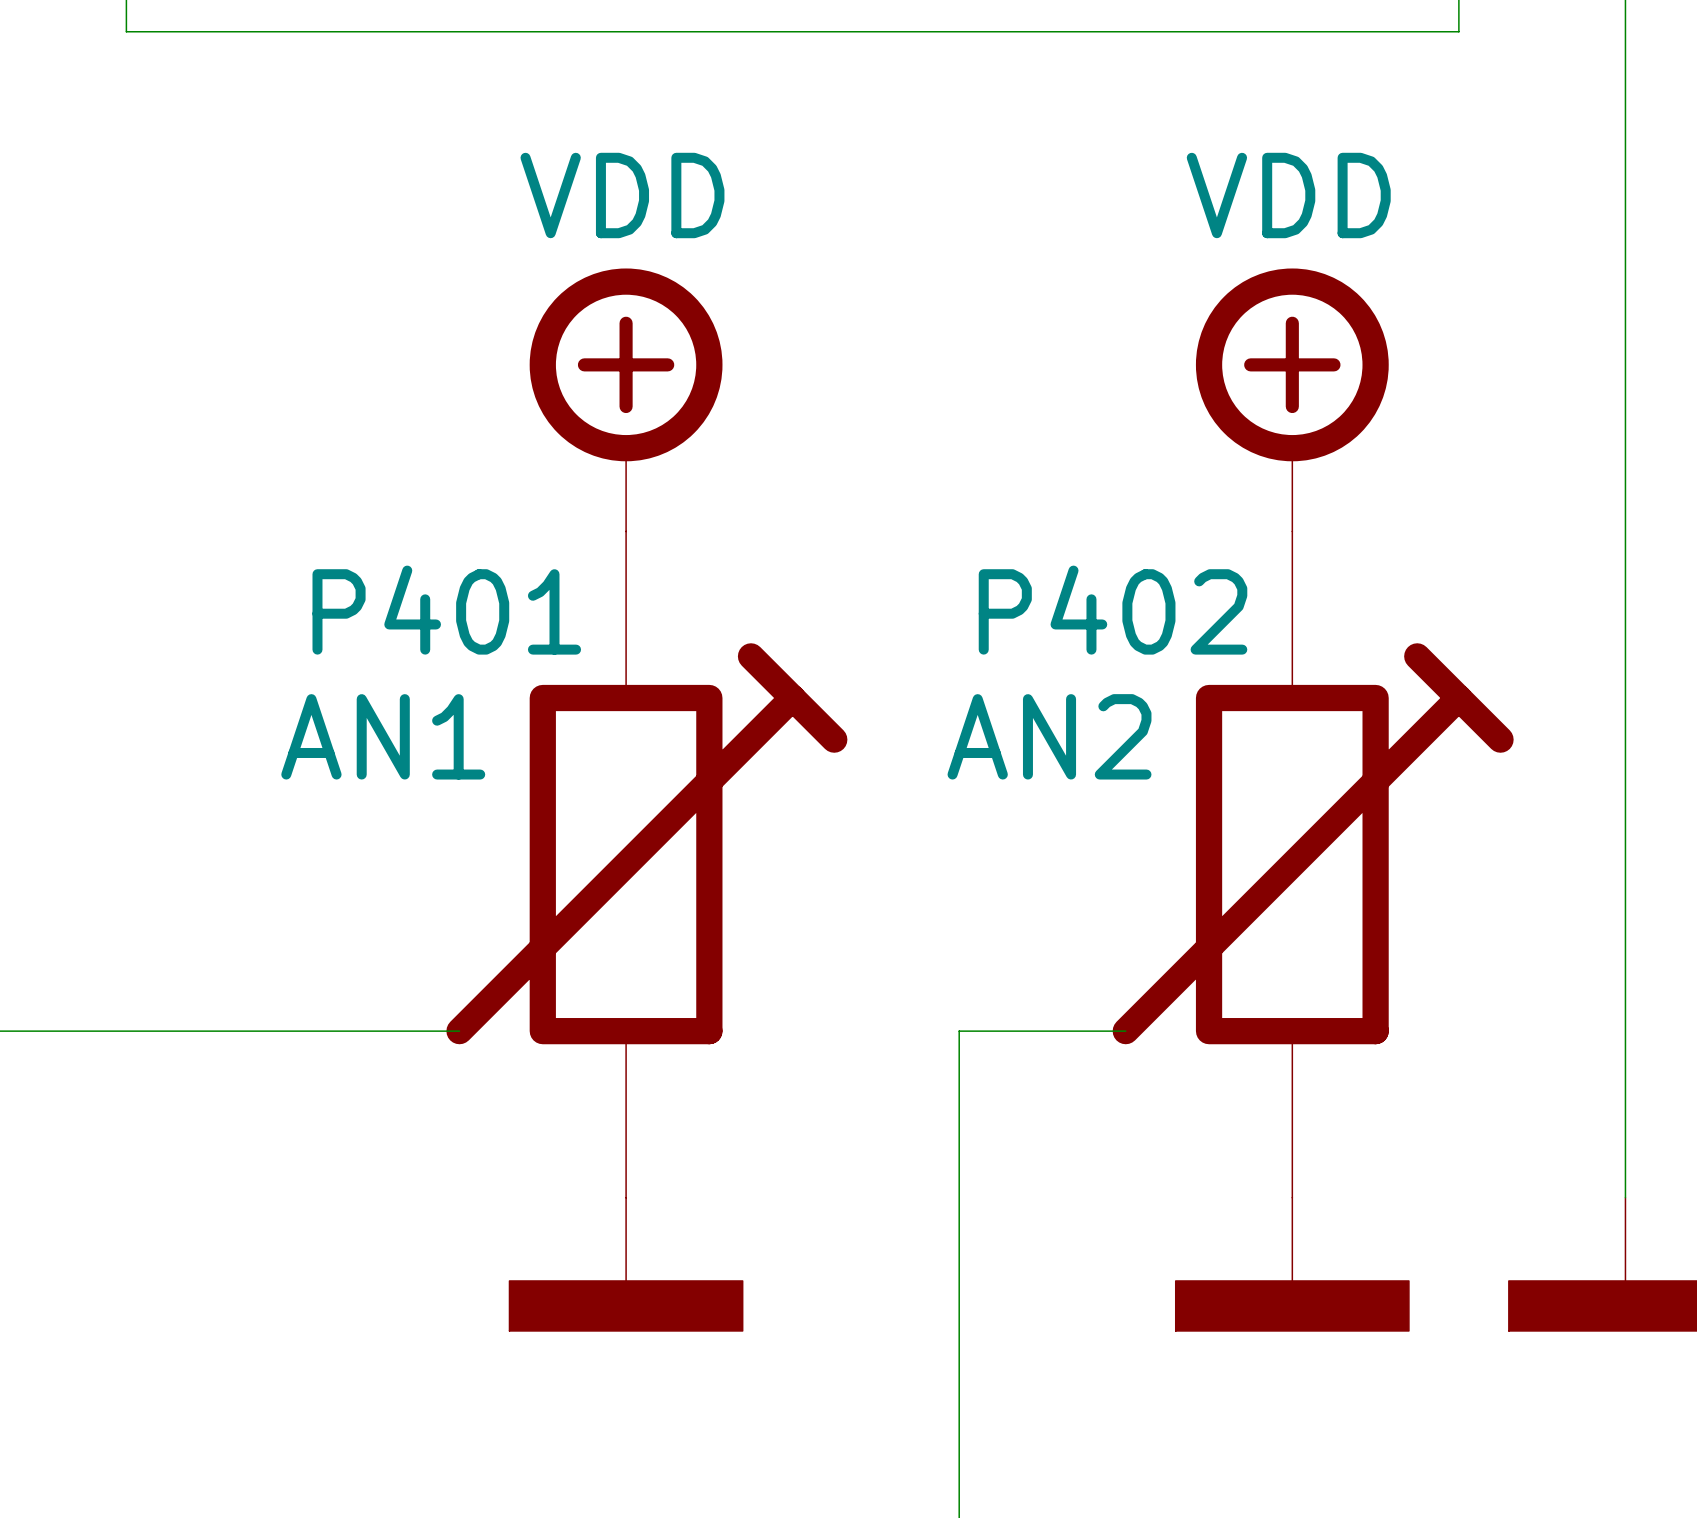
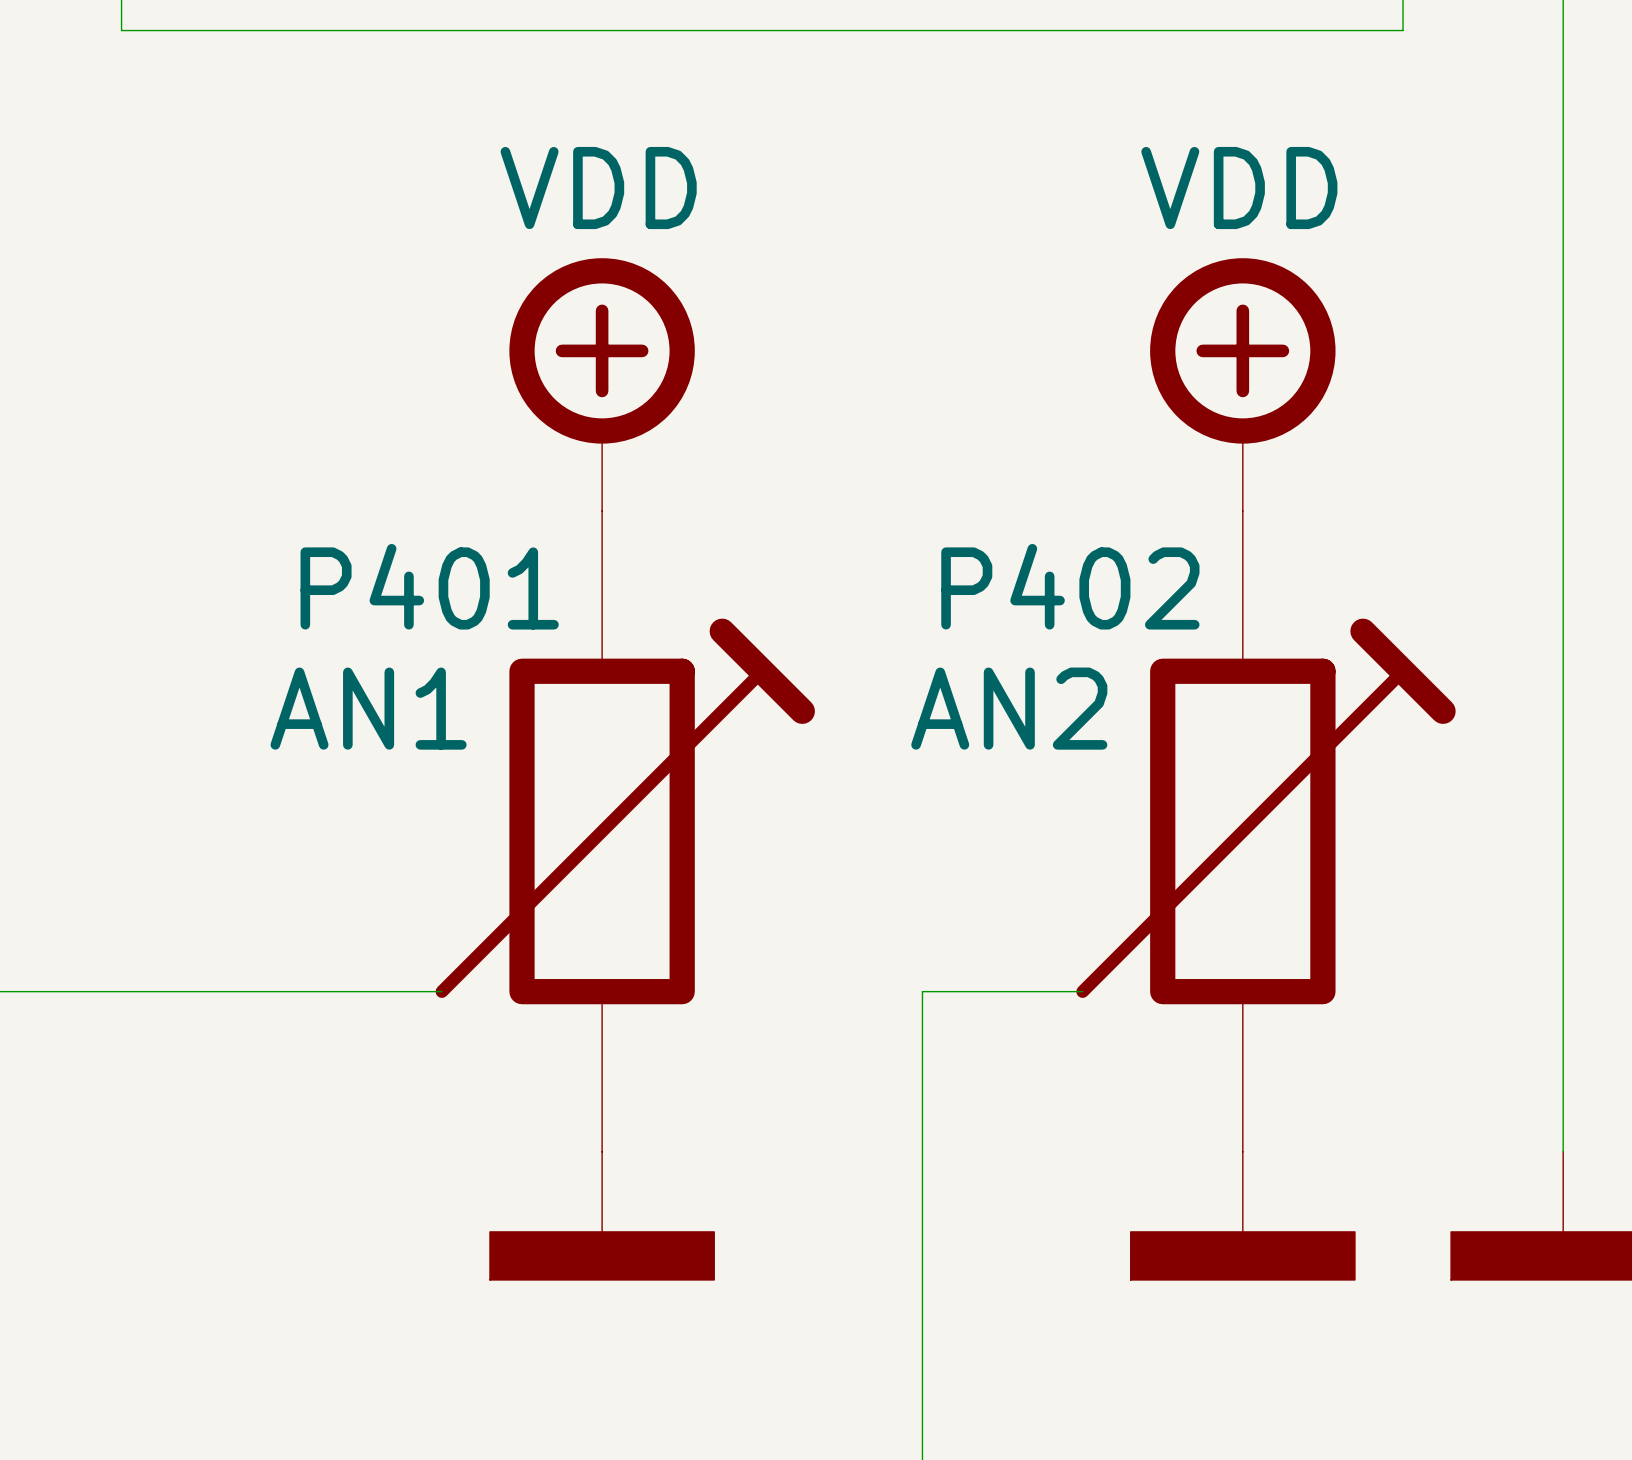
P401 symbol: [446, 531, 848, 1198] -> [435, 511, 815, 1152]
P402 symbol: [1112, 531, 1514, 1198] -> [1076, 511, 1456, 1152]

